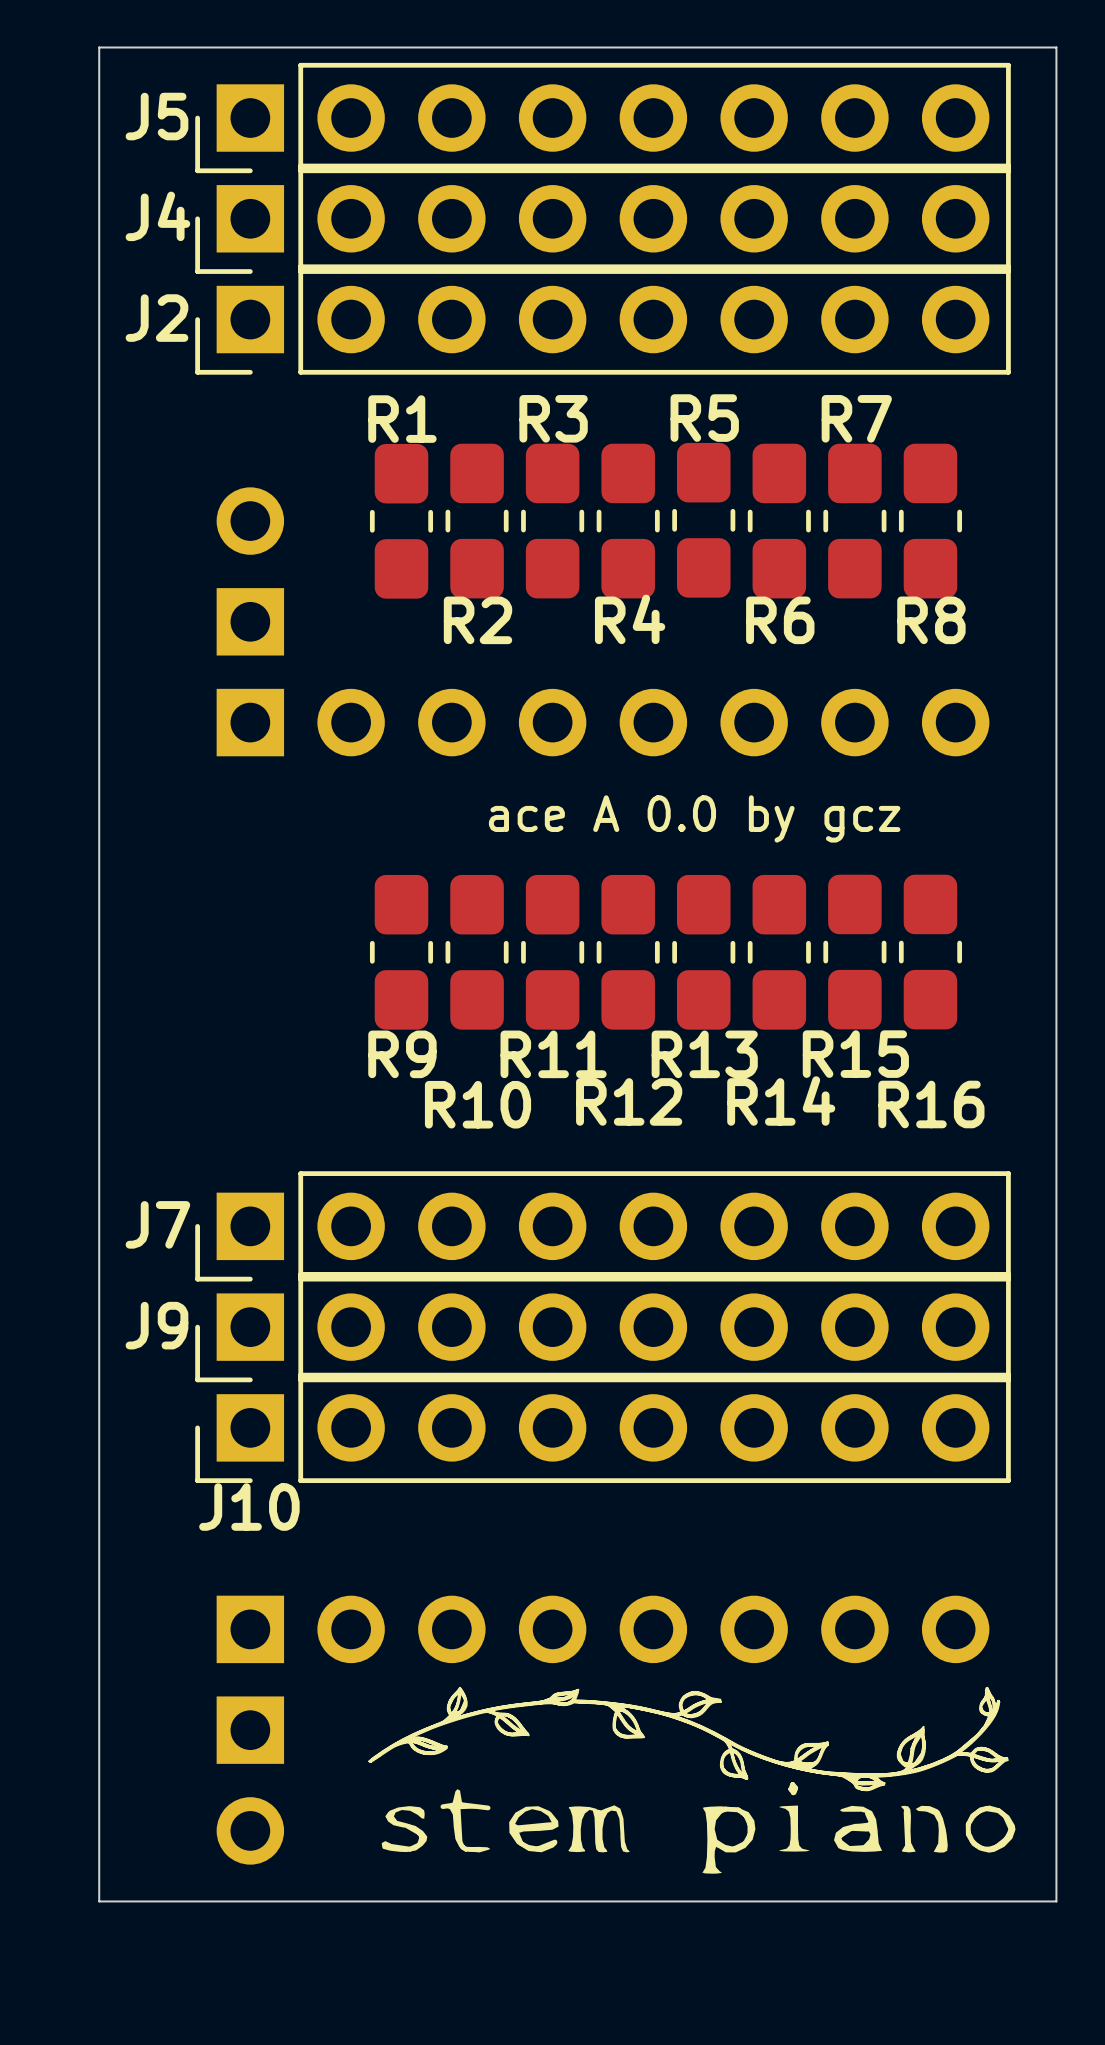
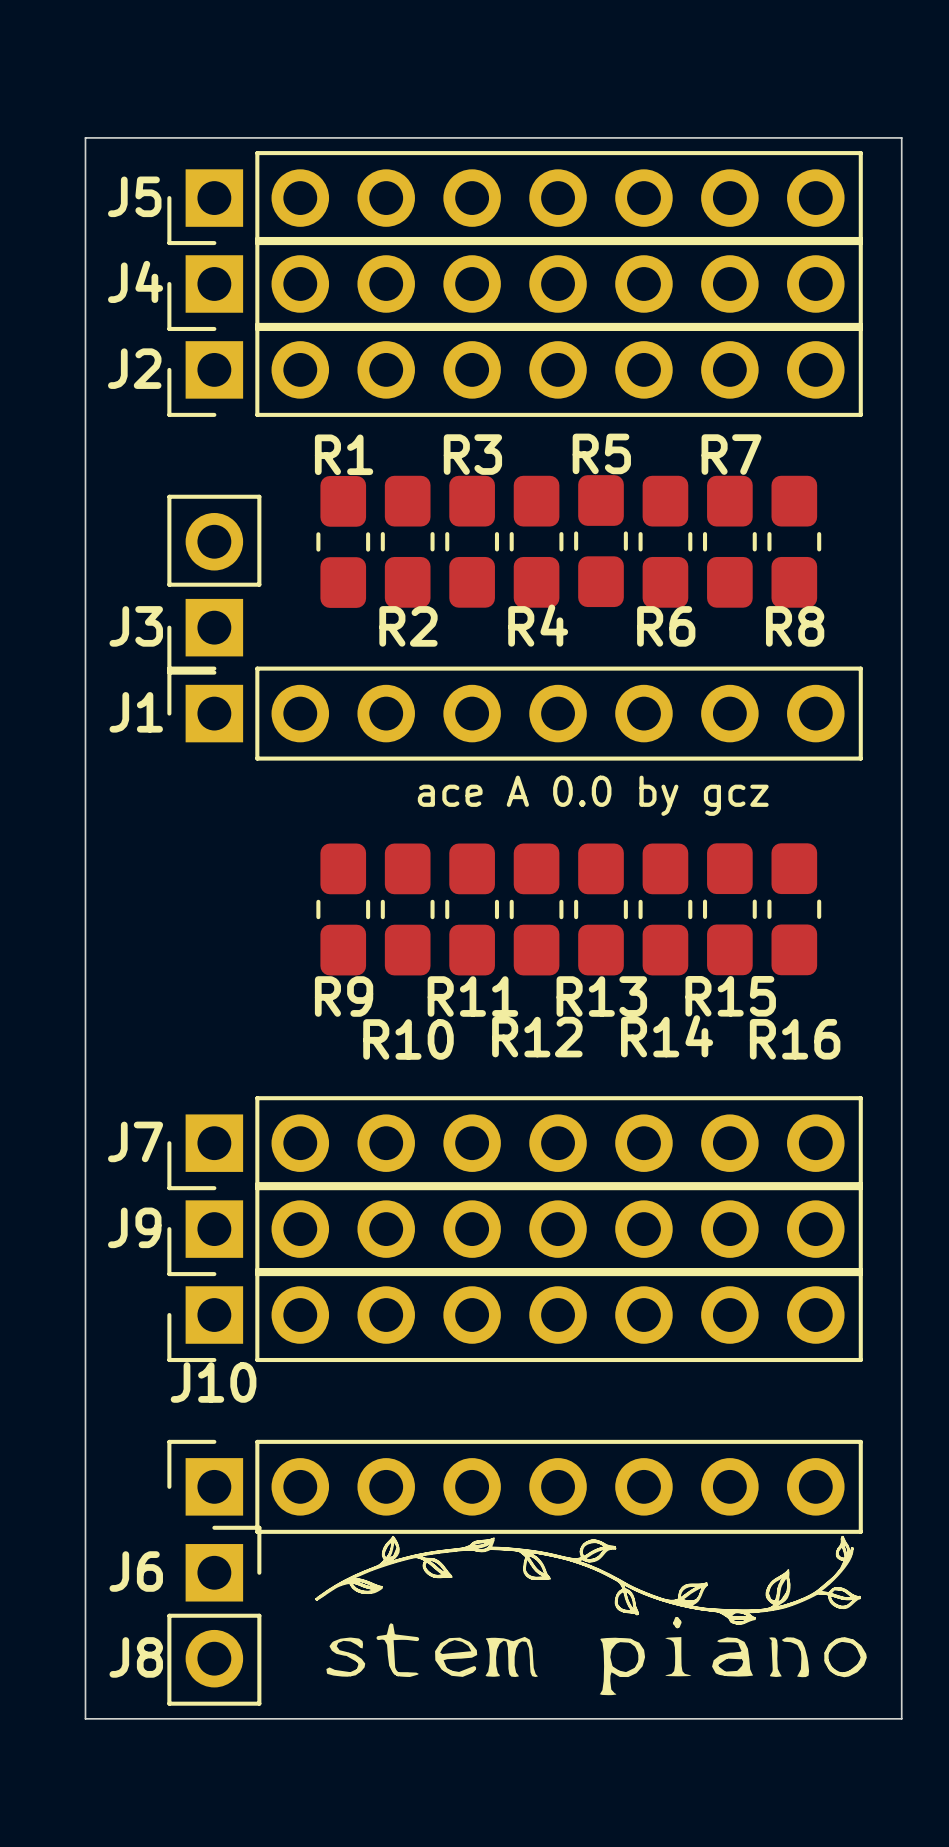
J3 side: bottom (250, 571) -> top (214, 584)
J1 side: bottom (603, 722) -> top (515, 713)
J6 side: bottom (603, 1629) -> top (515, 1486)
J8 side: bottom (250, 1780) -> top (214, 1615)

